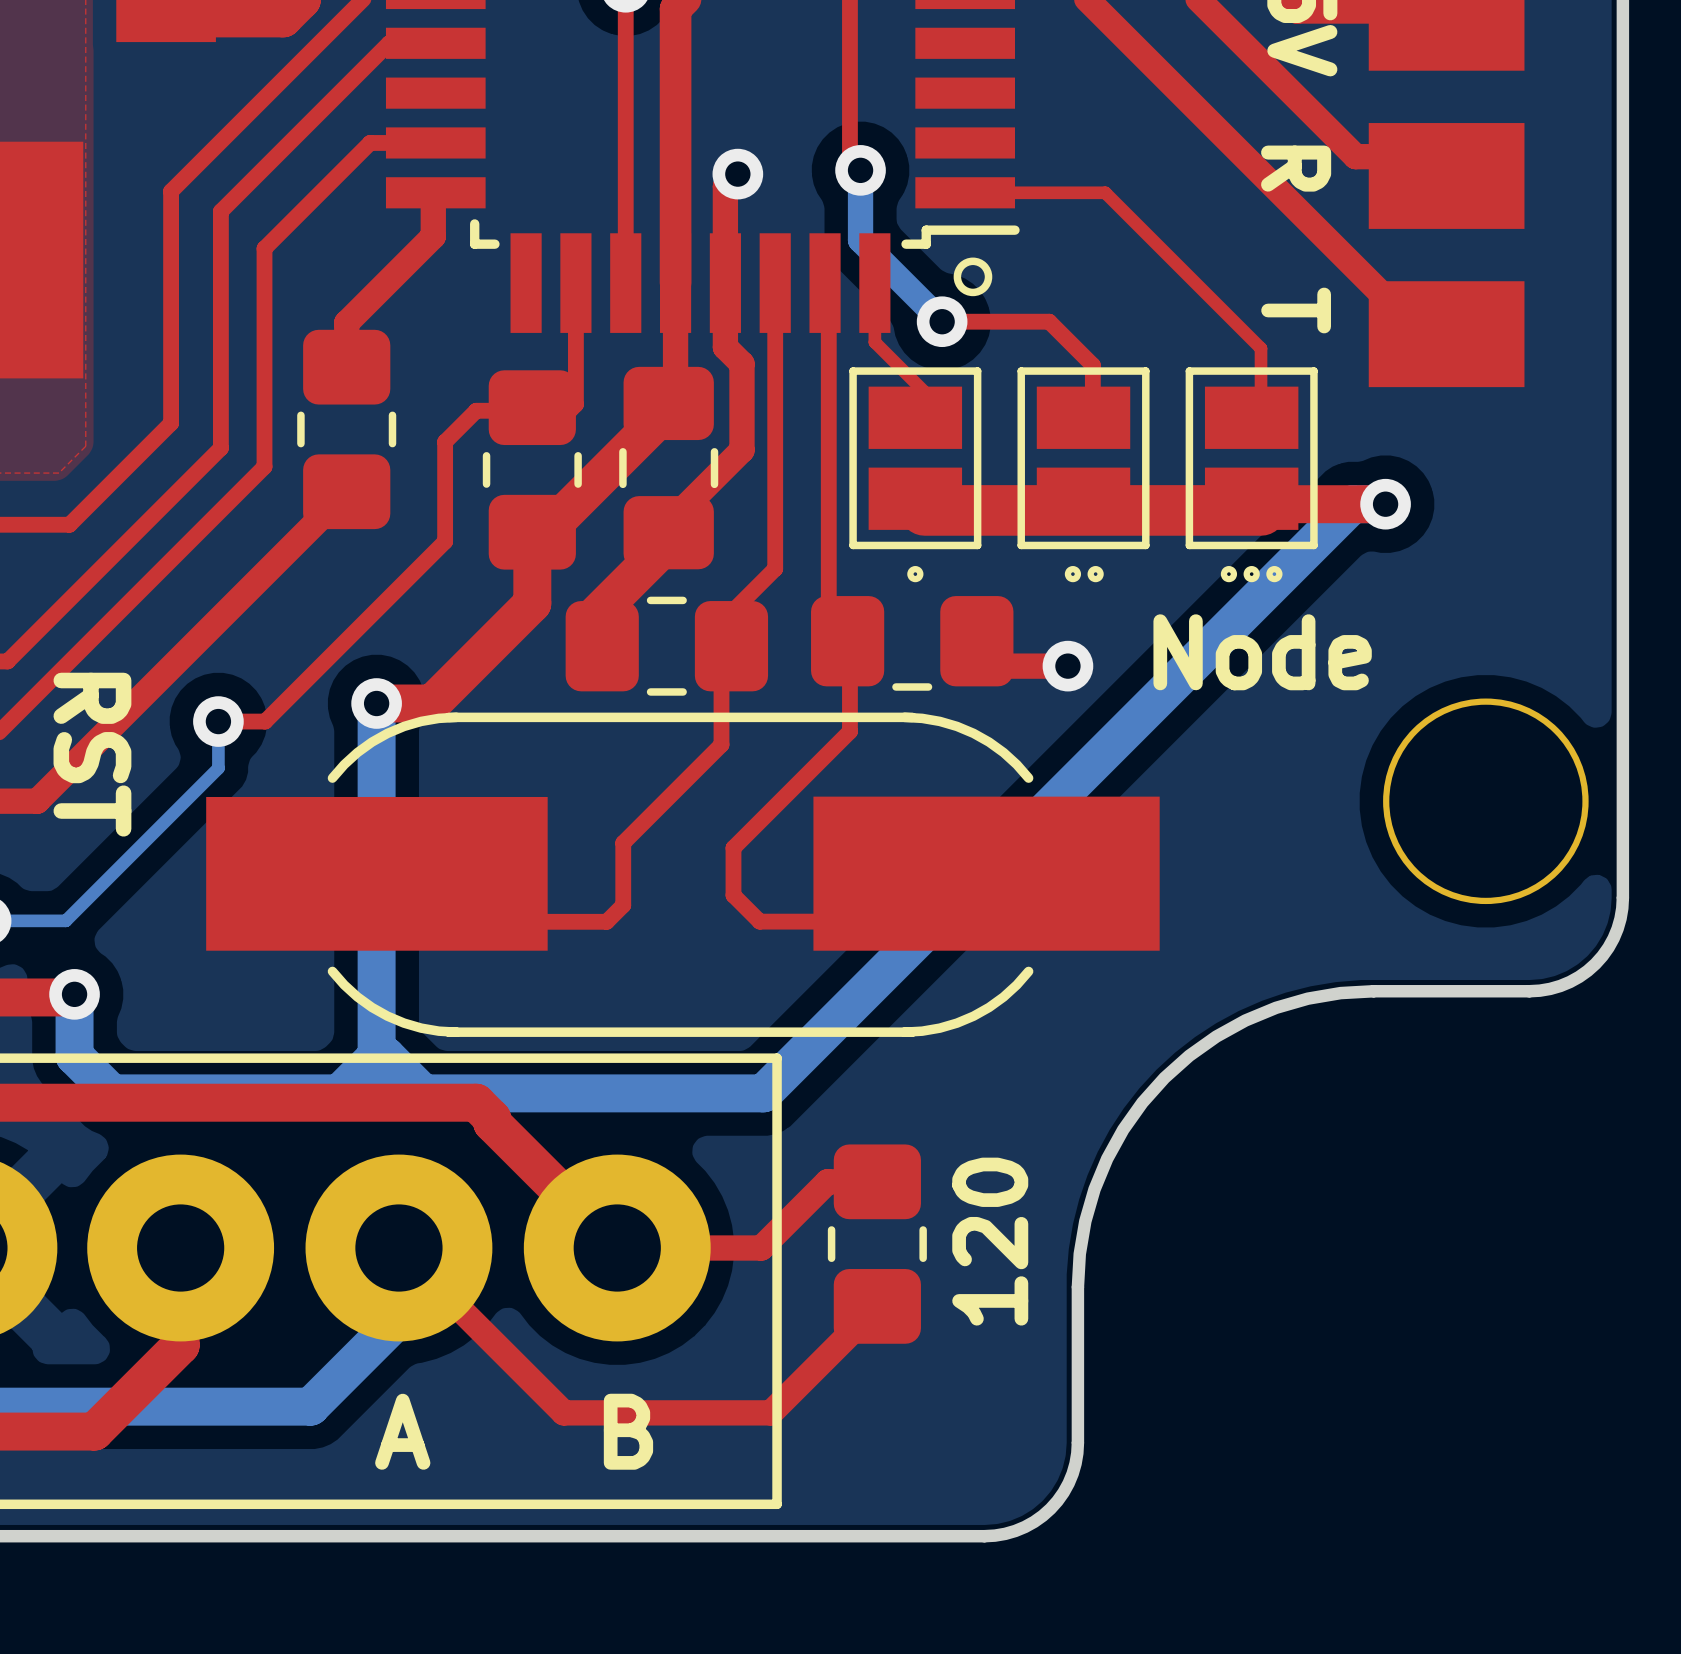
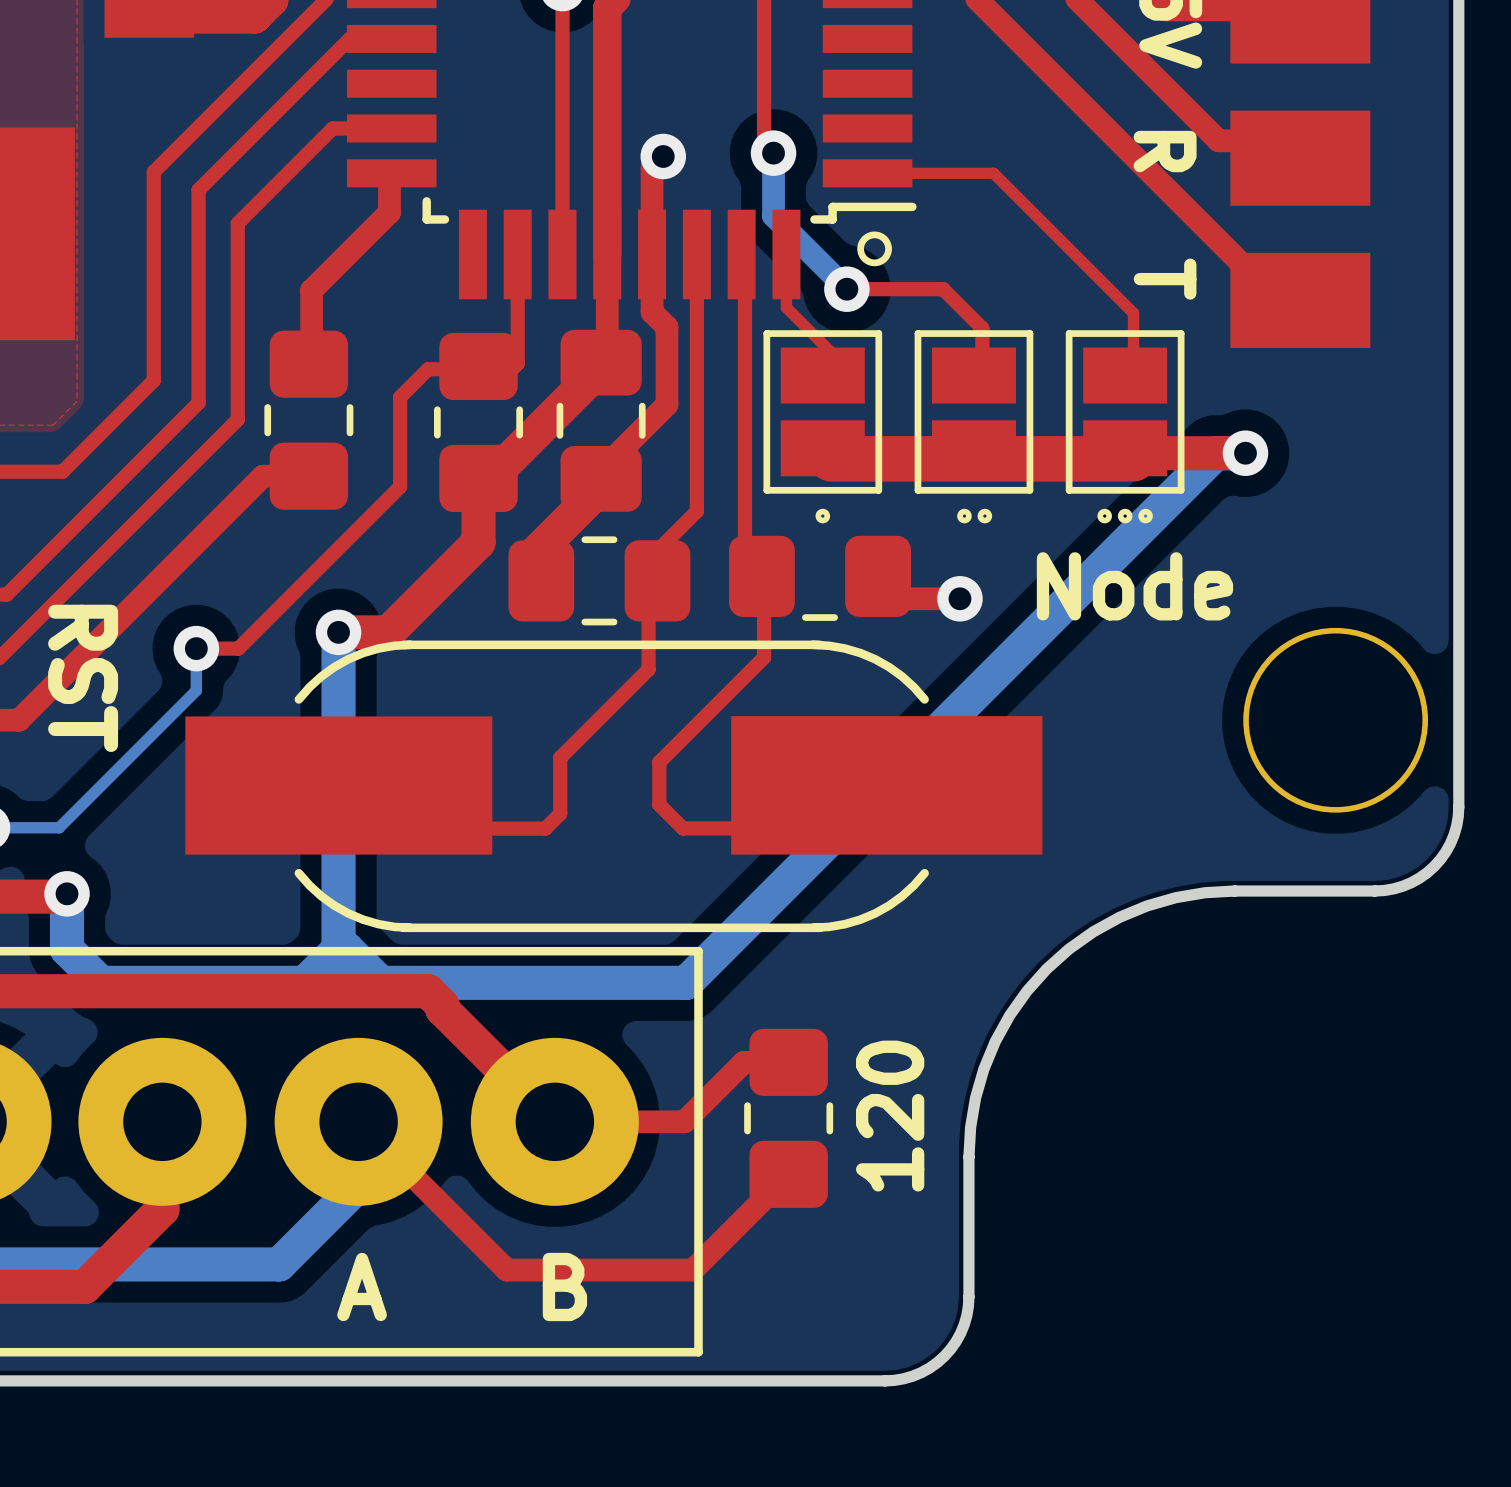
part position: (346, 429) -> (308, 420)
top track: (346, 491) (37, 801) (21, 801) -> (308, 476) (262, 476) (18, 720)

